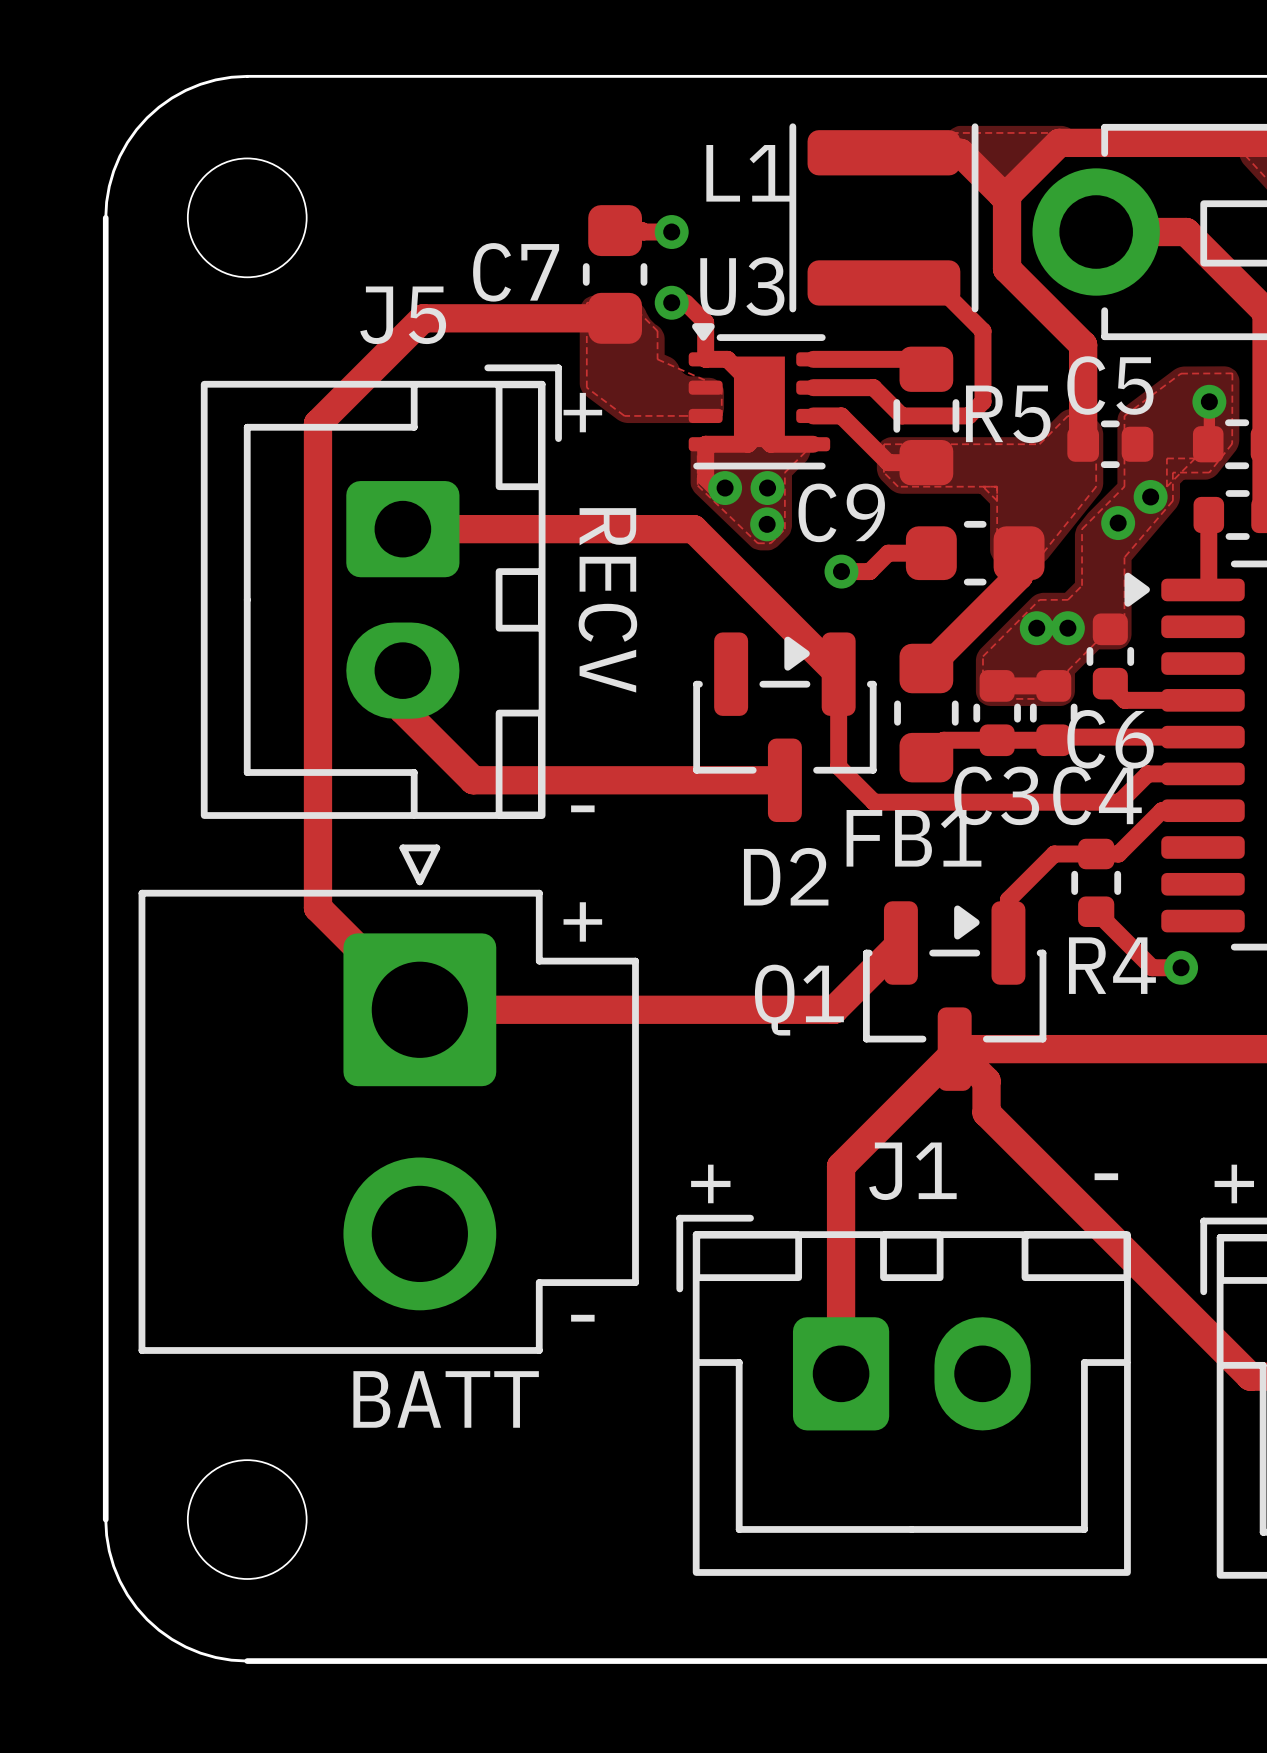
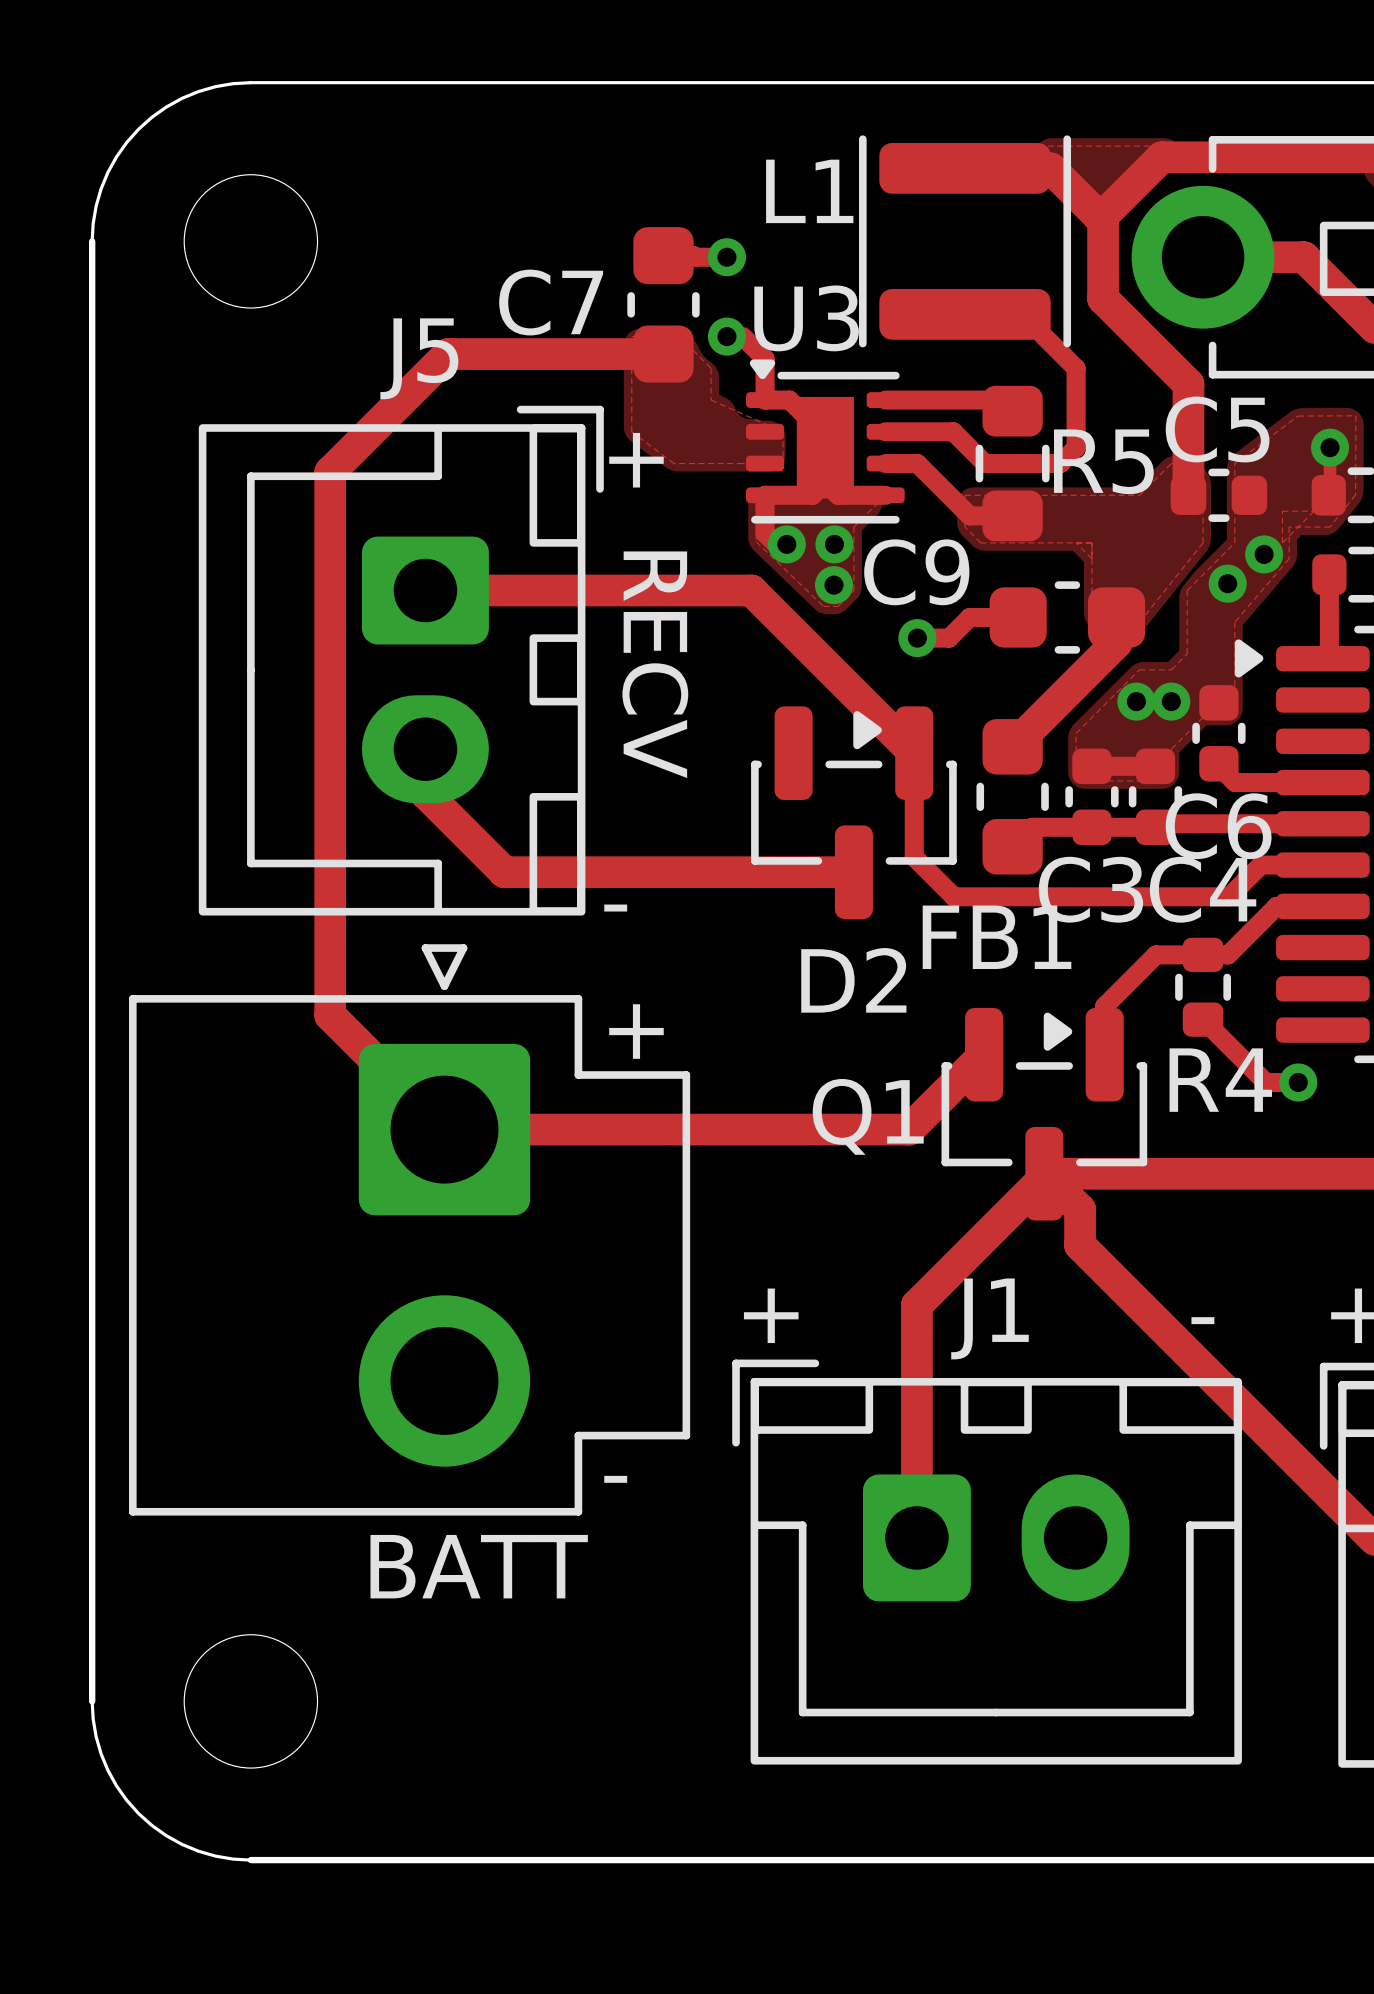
text position: RECV (607, 600) -> RECV (655, 664)

